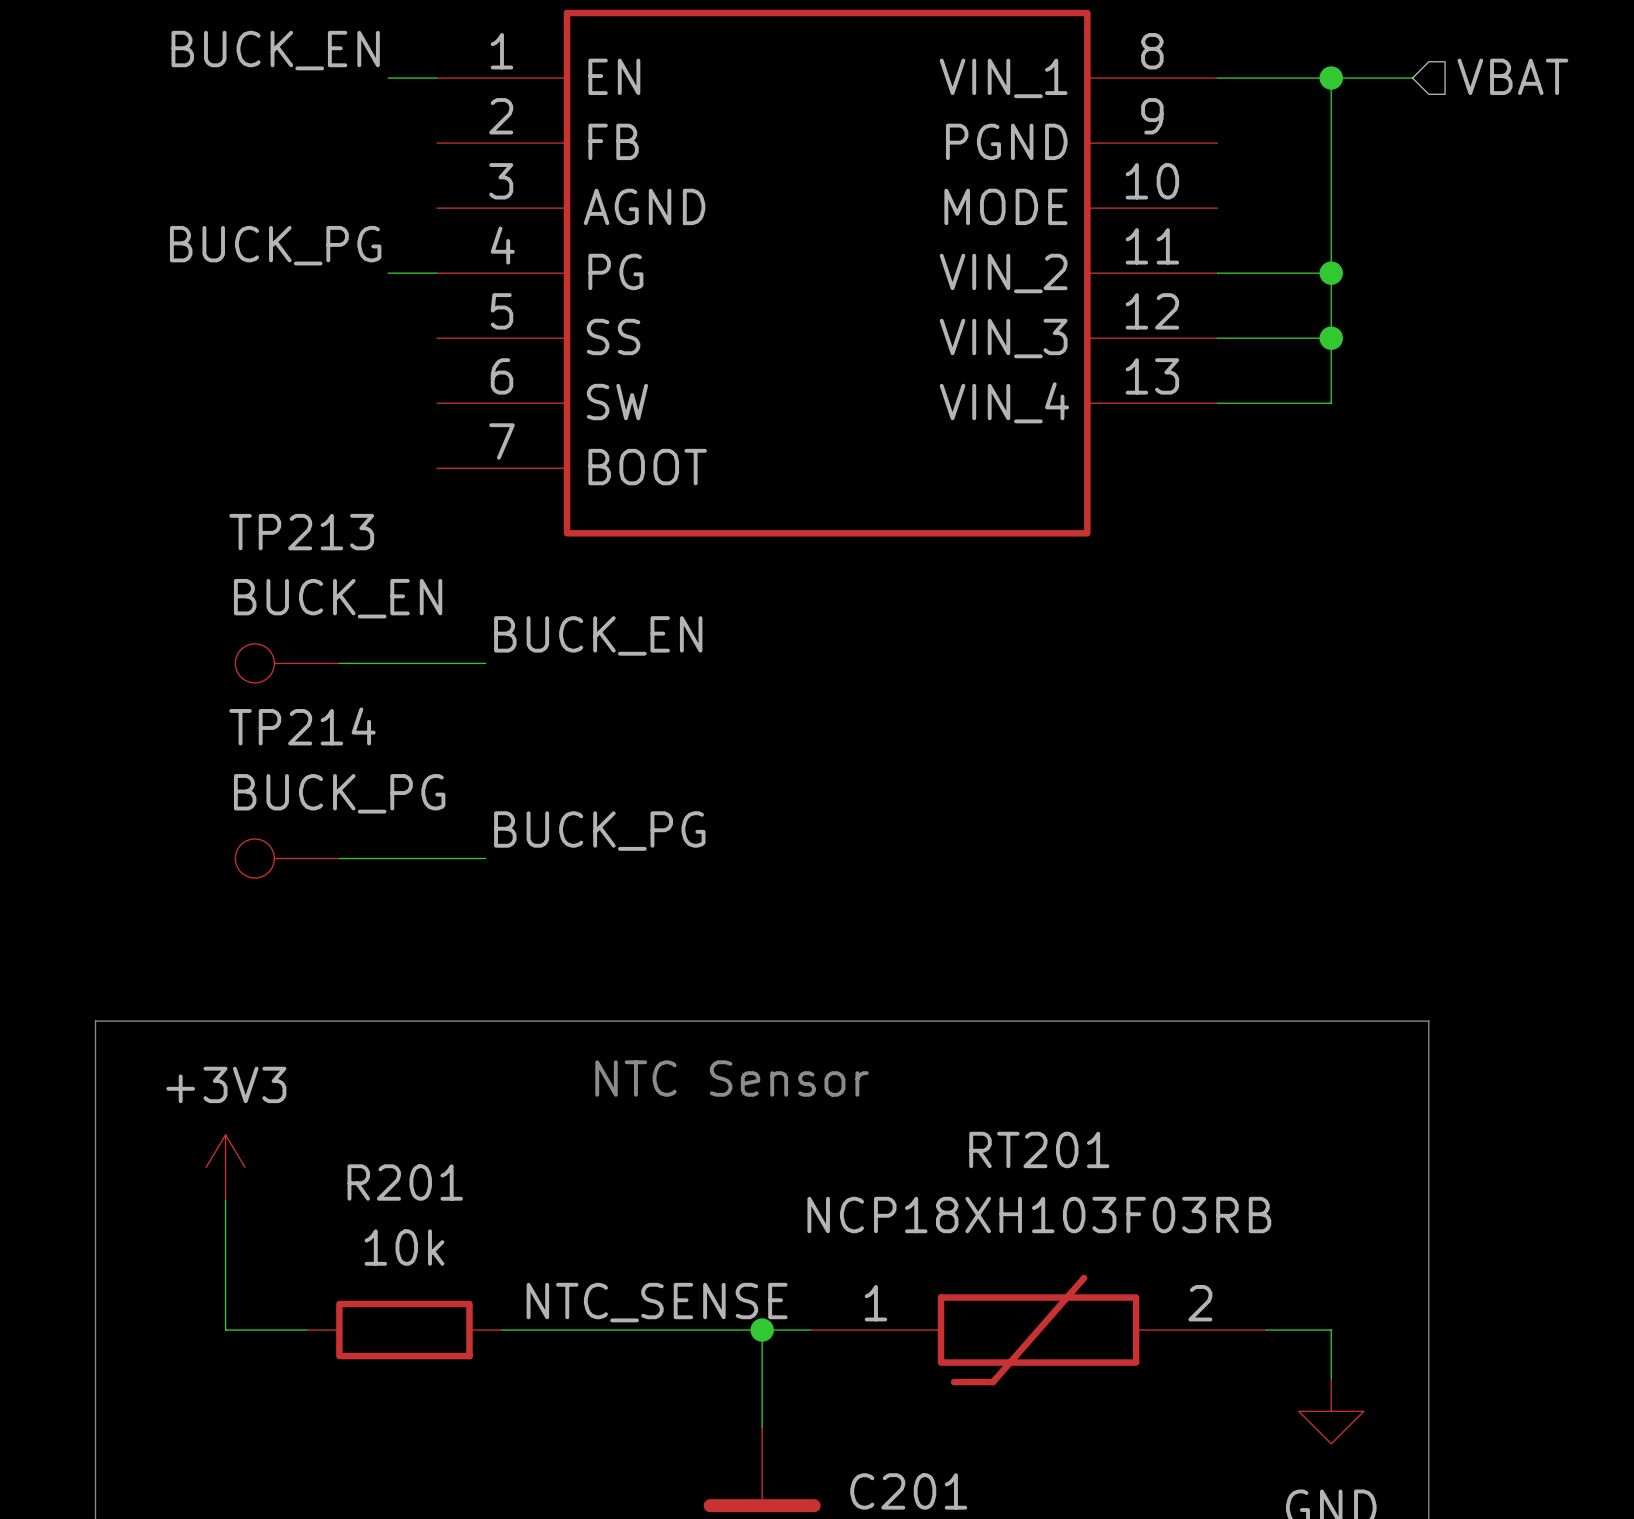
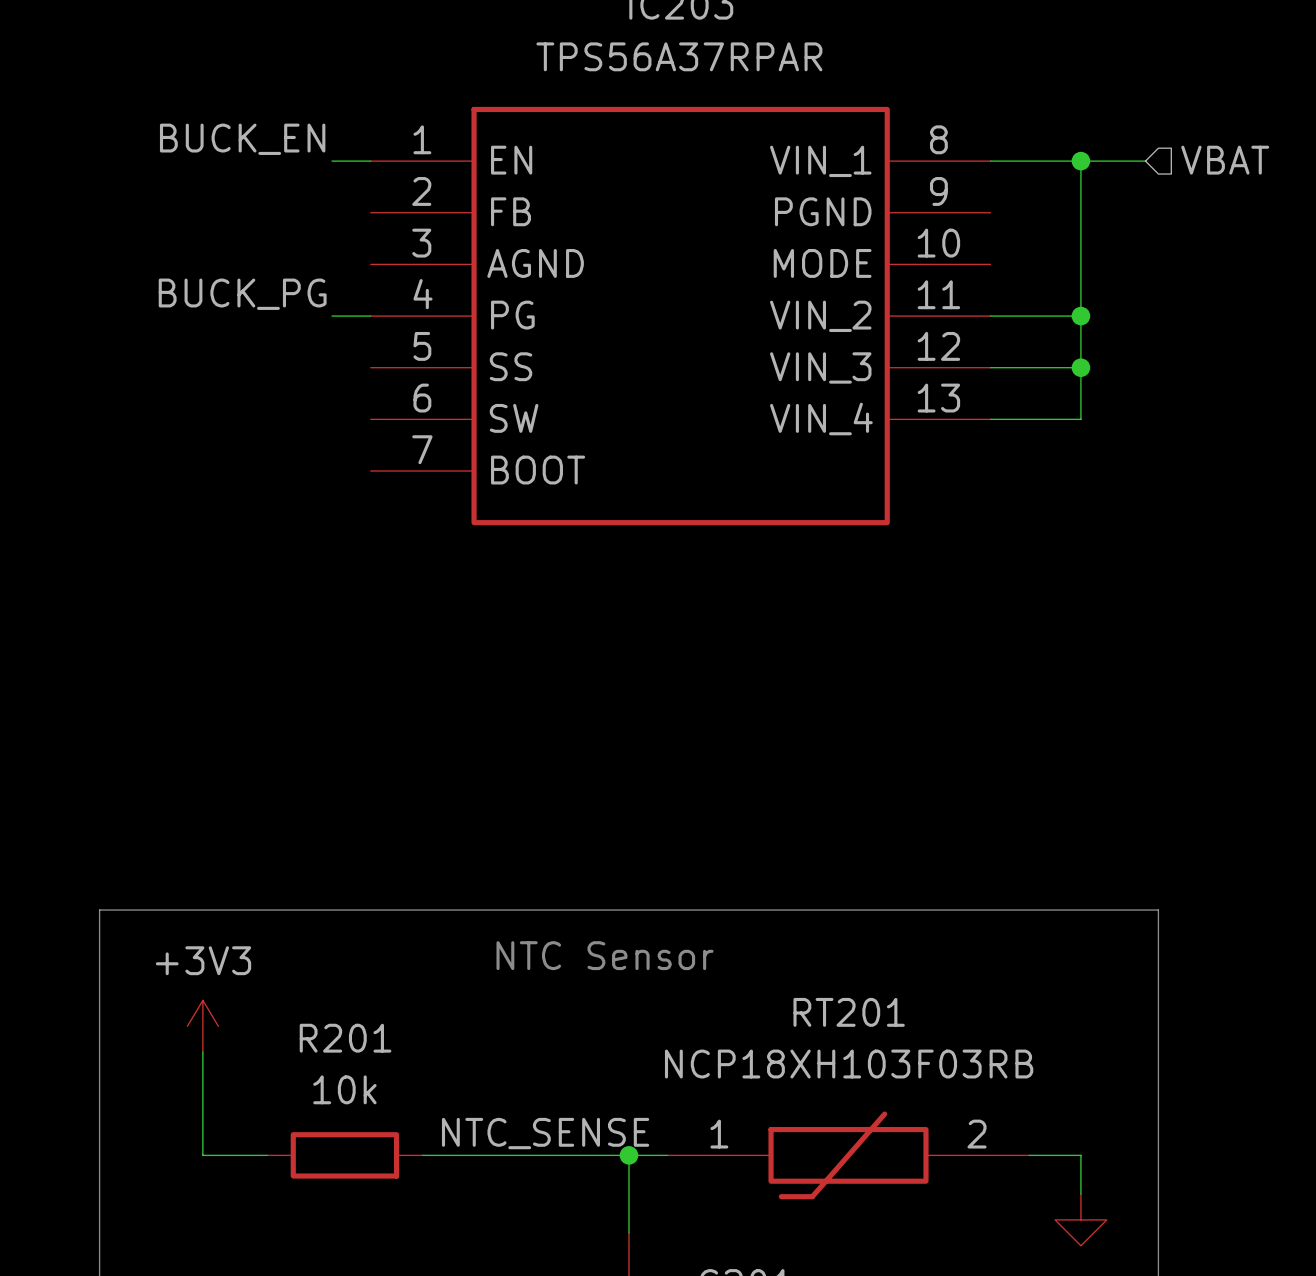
label: BUCK_EN (598, 635) -> none
TP213: BUCK_EN (287, 663) -> none
wire: (339, 663) (485, 663) -> none
label: BUCK_PG (599, 831) -> none
TP214: BUCK_PG (287, 858) -> none
wire: (339, 858) (485, 858) -> none

